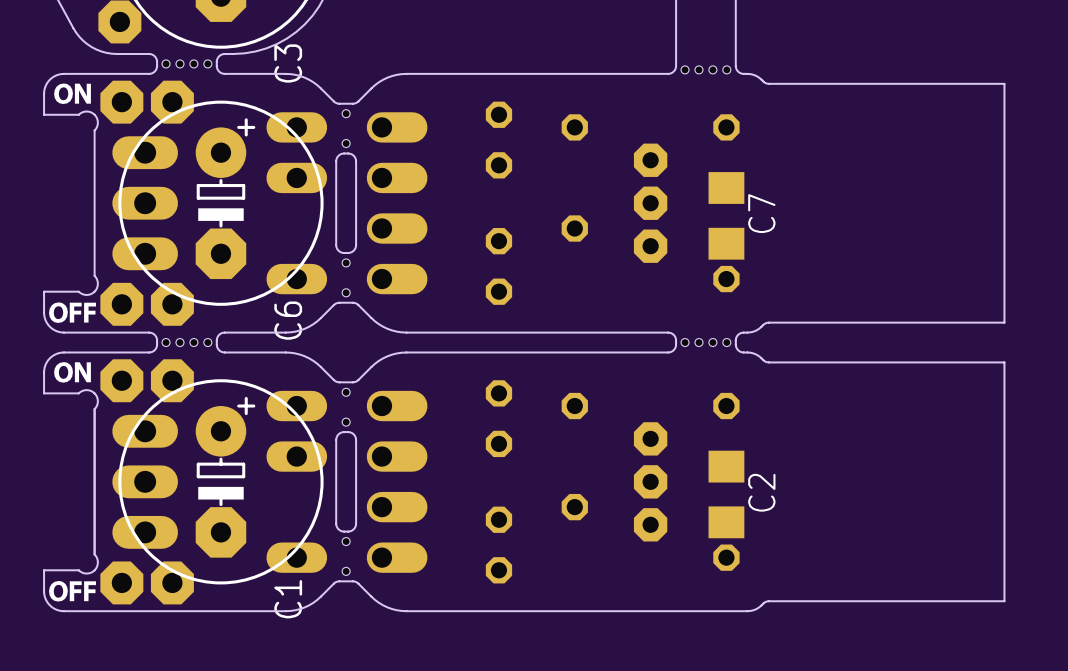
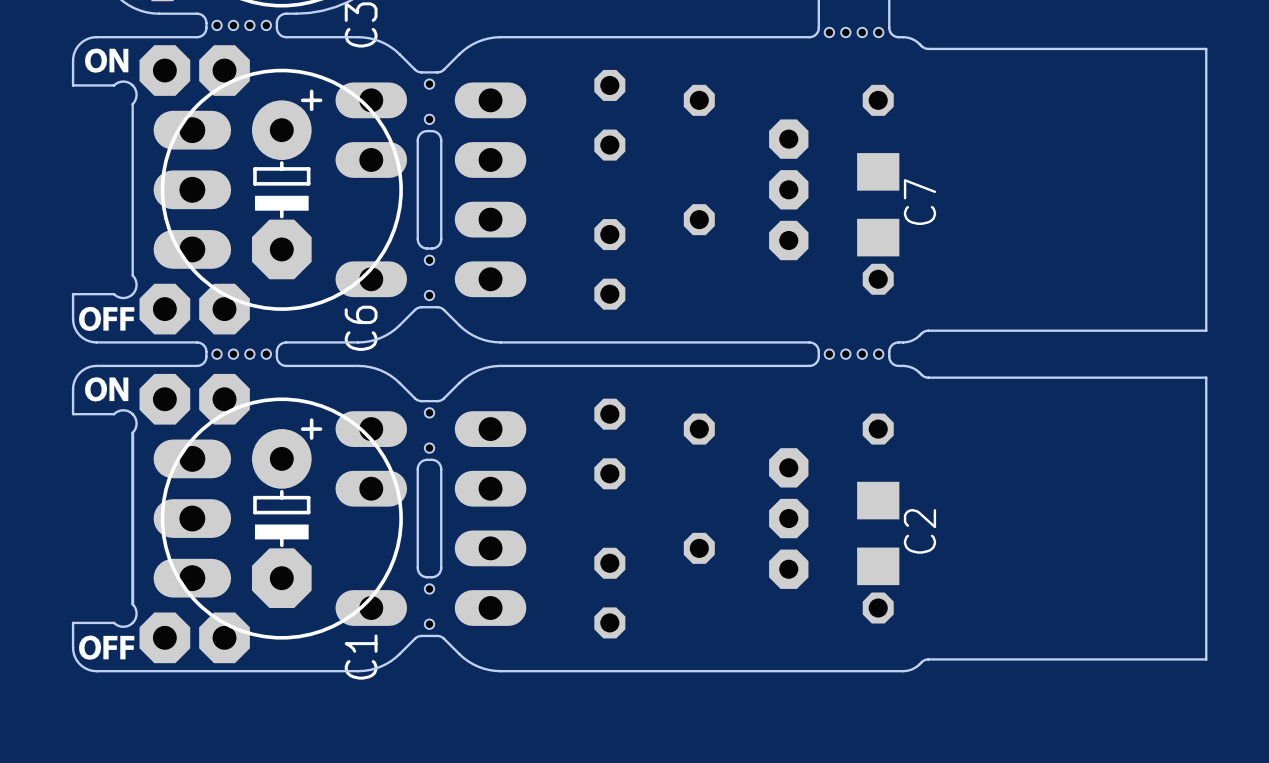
part footprint: [366, 112, 428, 295] -> [454, 82, 527, 298]
part footprint: [366, 390, 428, 573] -> [454, 411, 527, 626]

